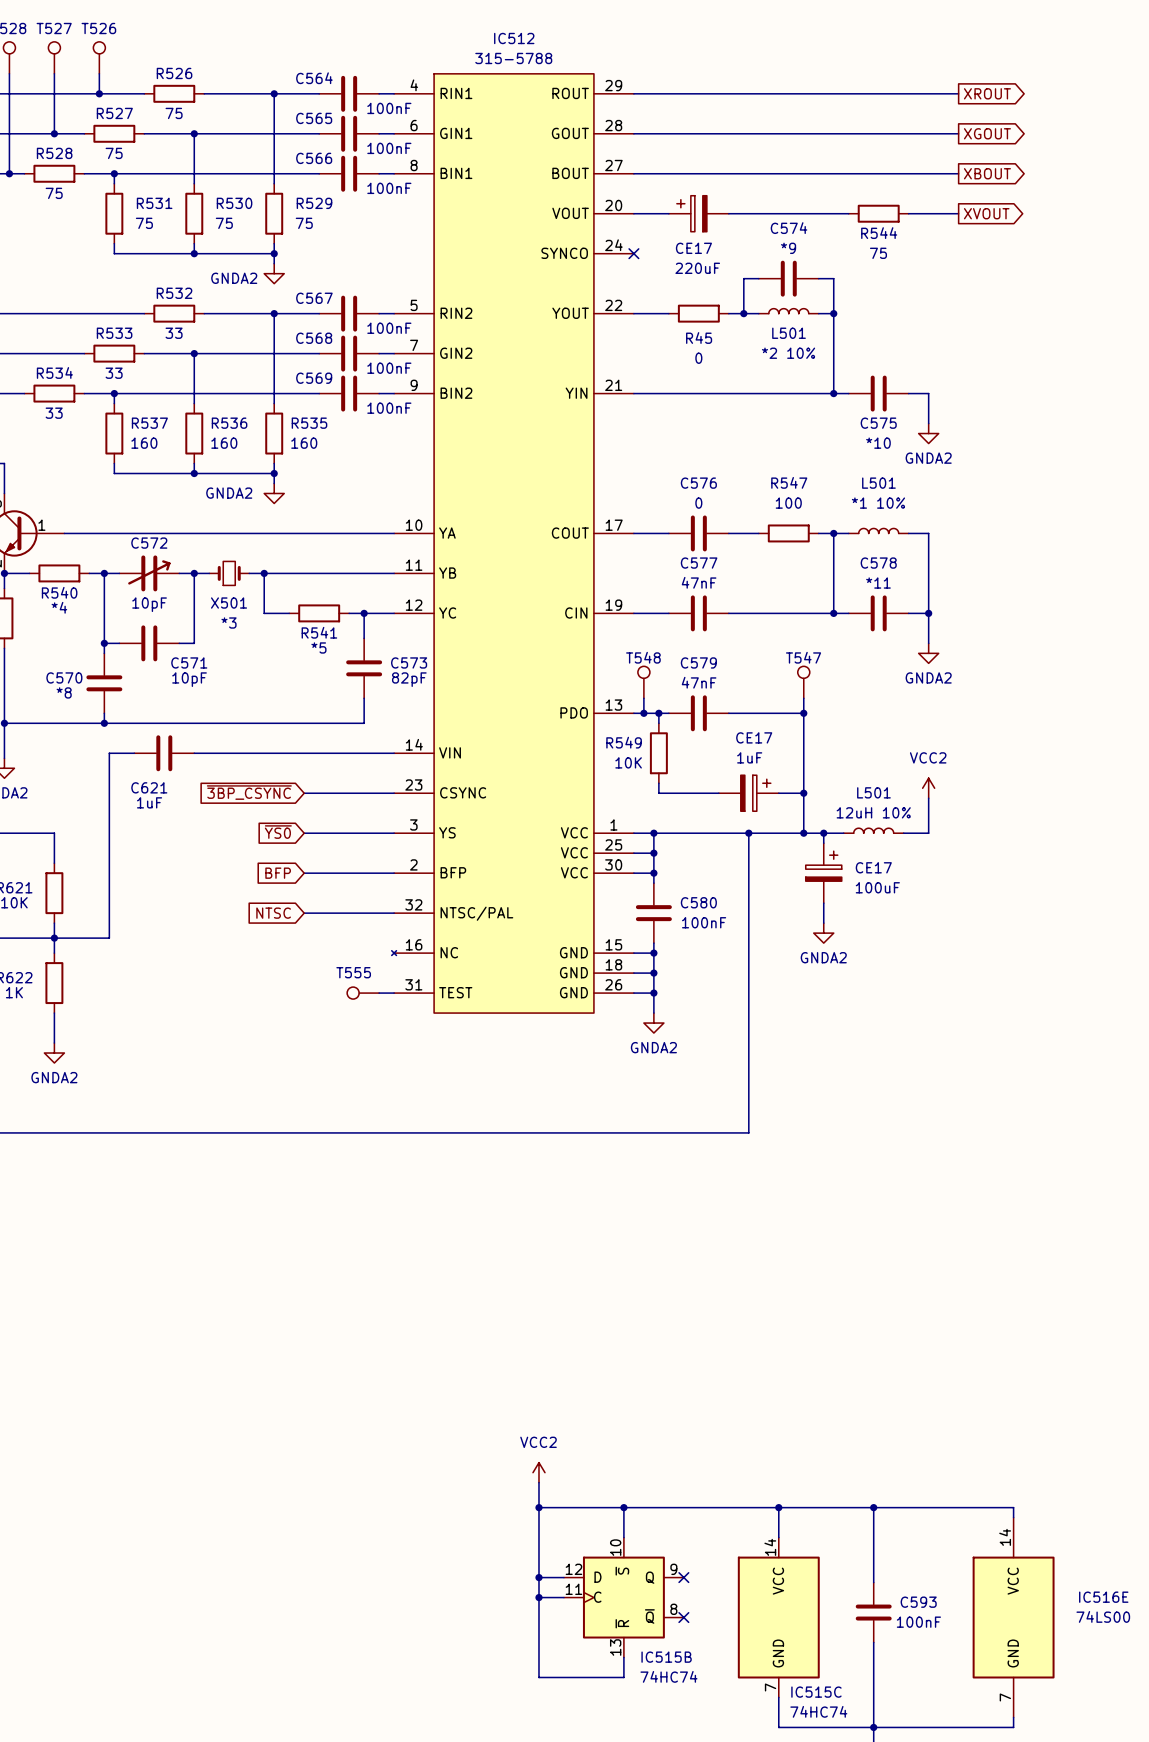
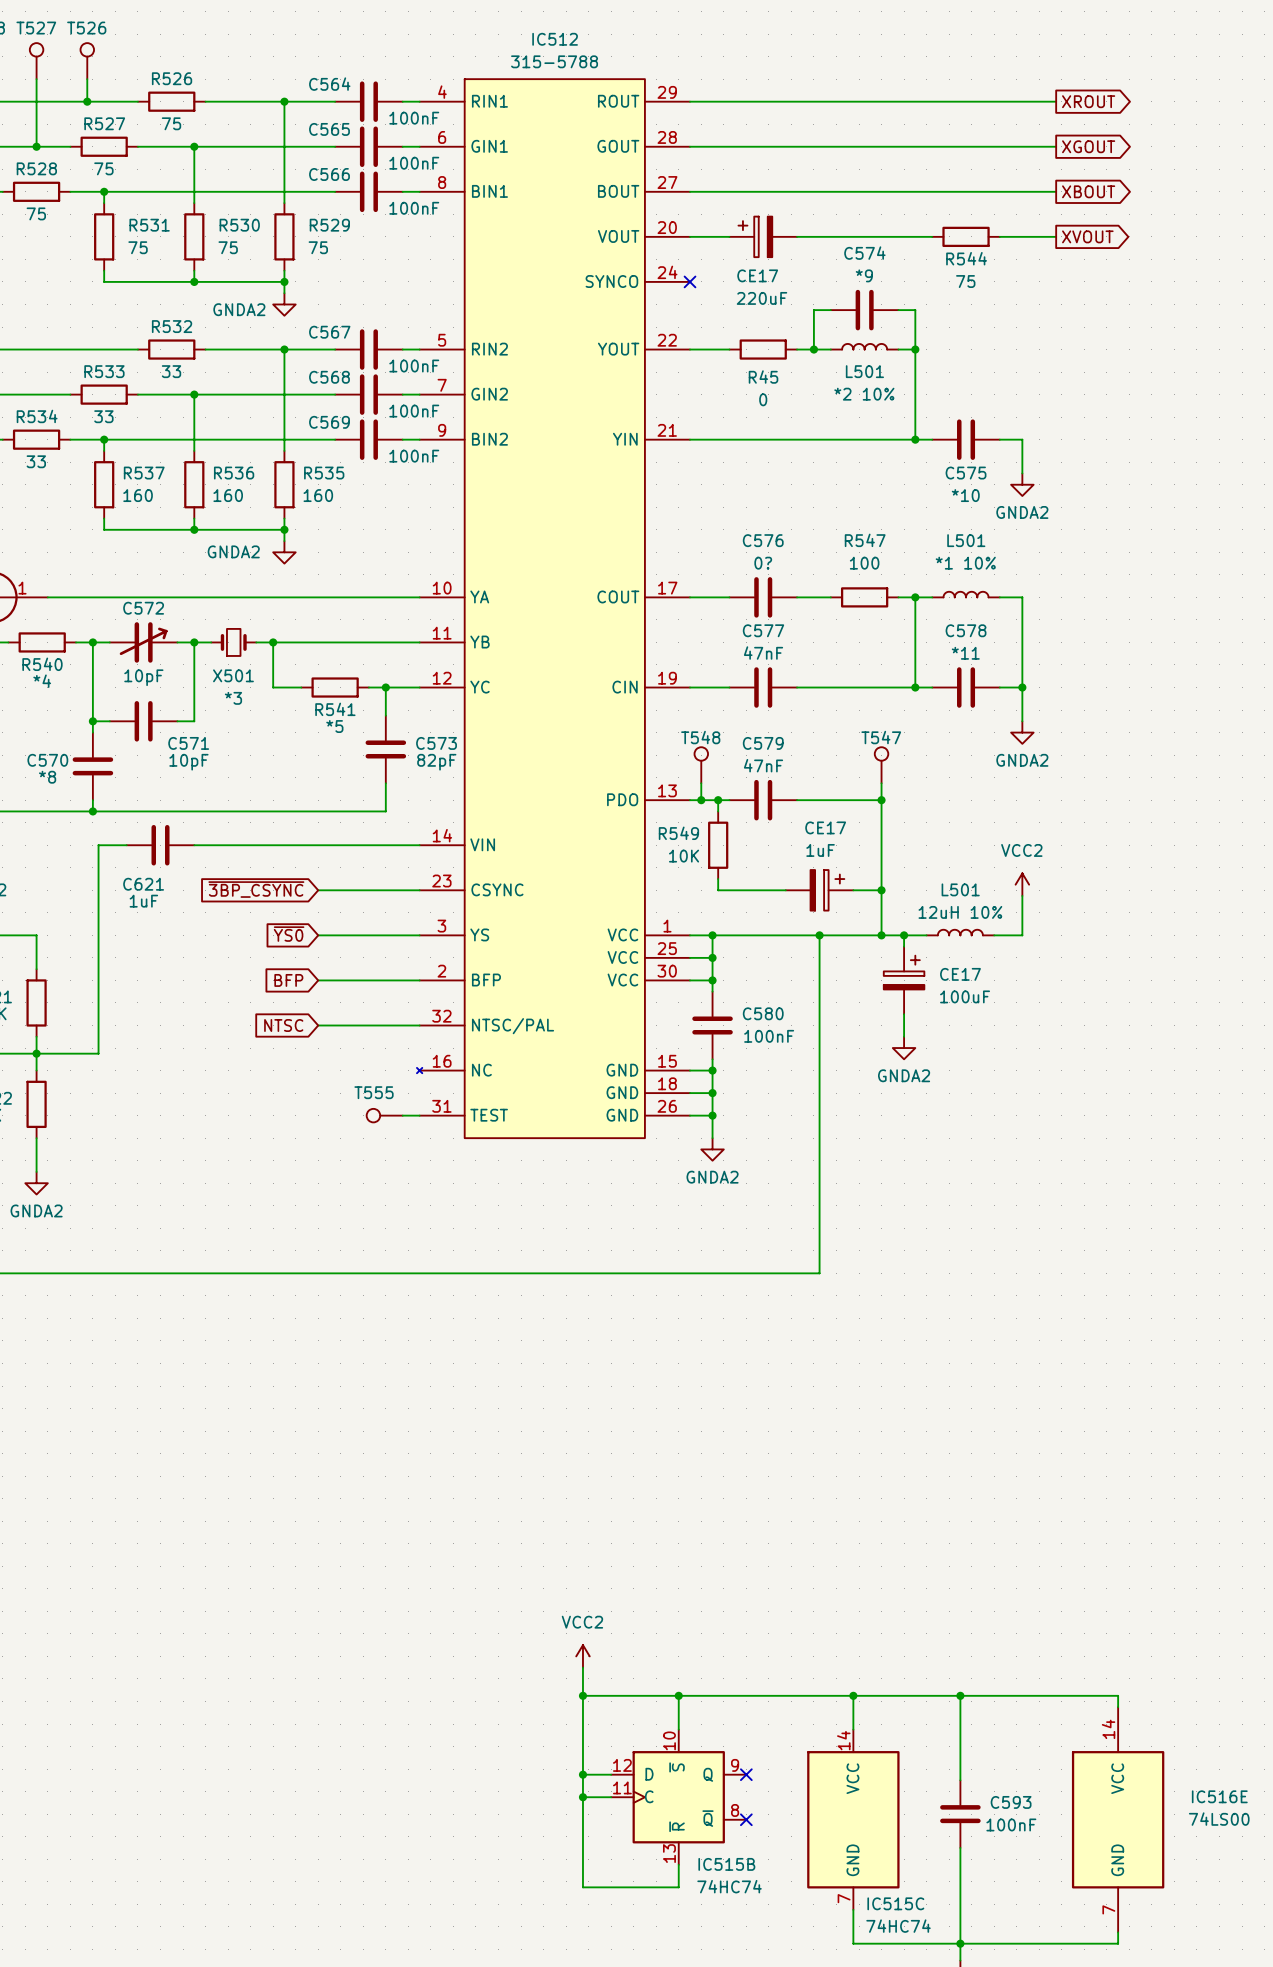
C576 value: 0 (698, 503) -> 0? (763, 563)

